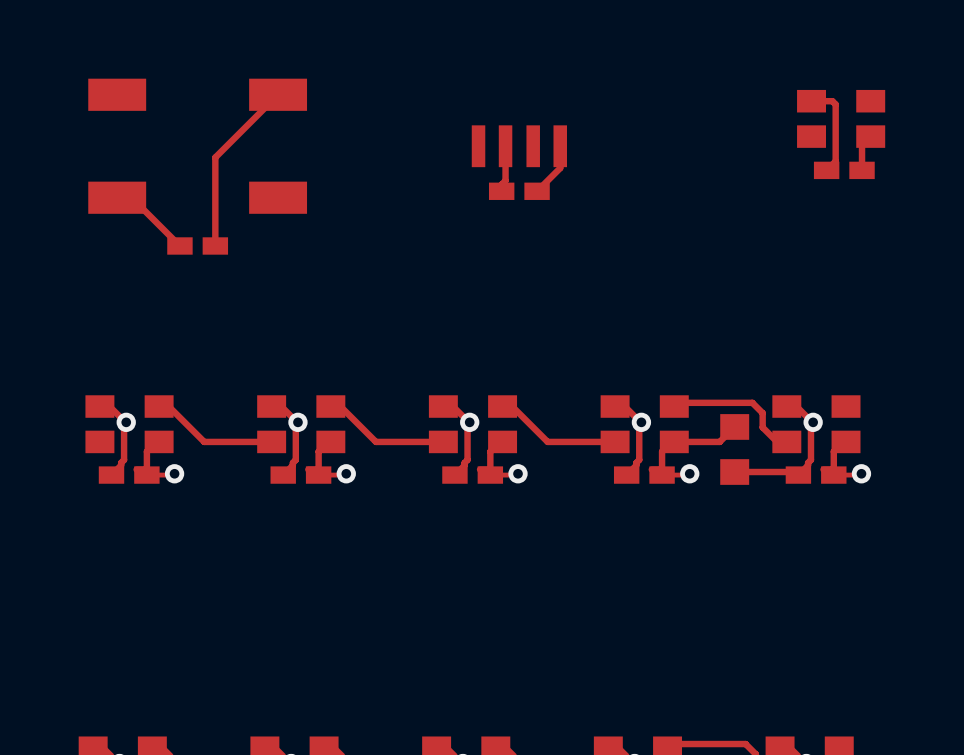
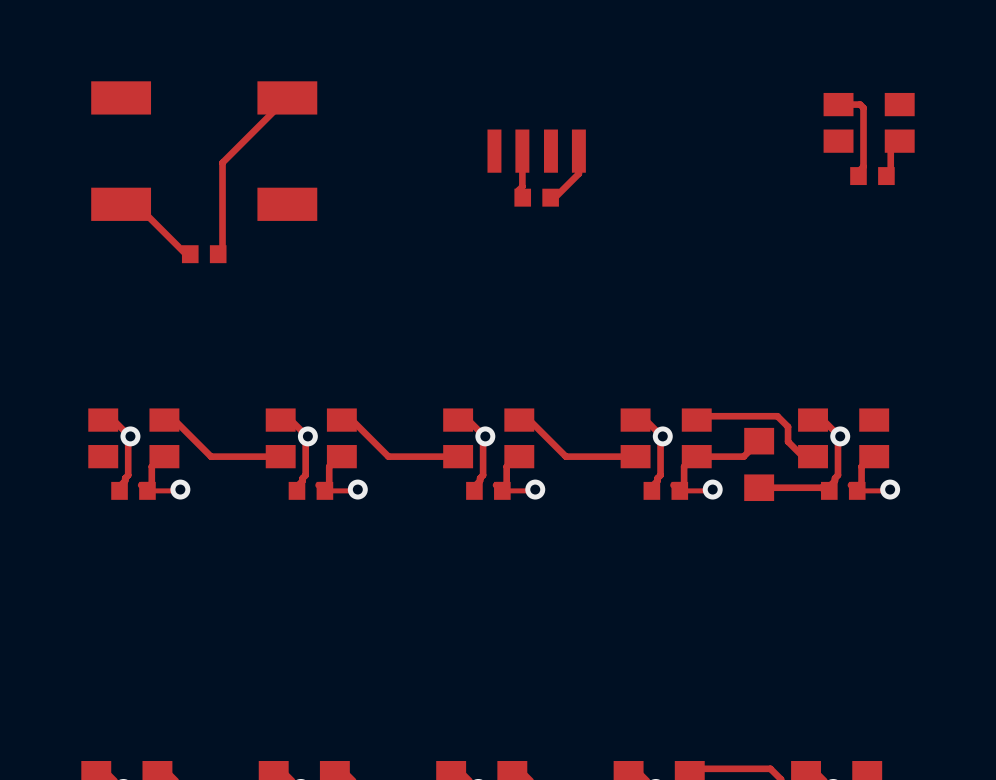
part footprint: [813, 161, 875, 180] -> [850, 167, 895, 186]
part footprint: [488, 182, 550, 200] -> [514, 188, 559, 207]
part footprint: [167, 237, 229, 255] -> [181, 245, 227, 264]
part footprint: [98, 466, 160, 484] -> [111, 481, 156, 500]
part footprint: [270, 466, 332, 484] -> [288, 481, 334, 500]
part footprint: [442, 466, 504, 484] -> [466, 481, 511, 500]
part footprint: [613, 466, 675, 484] -> [643, 481, 689, 500]
part footprint: [785, 466, 847, 484] -> [821, 481, 866, 500]

